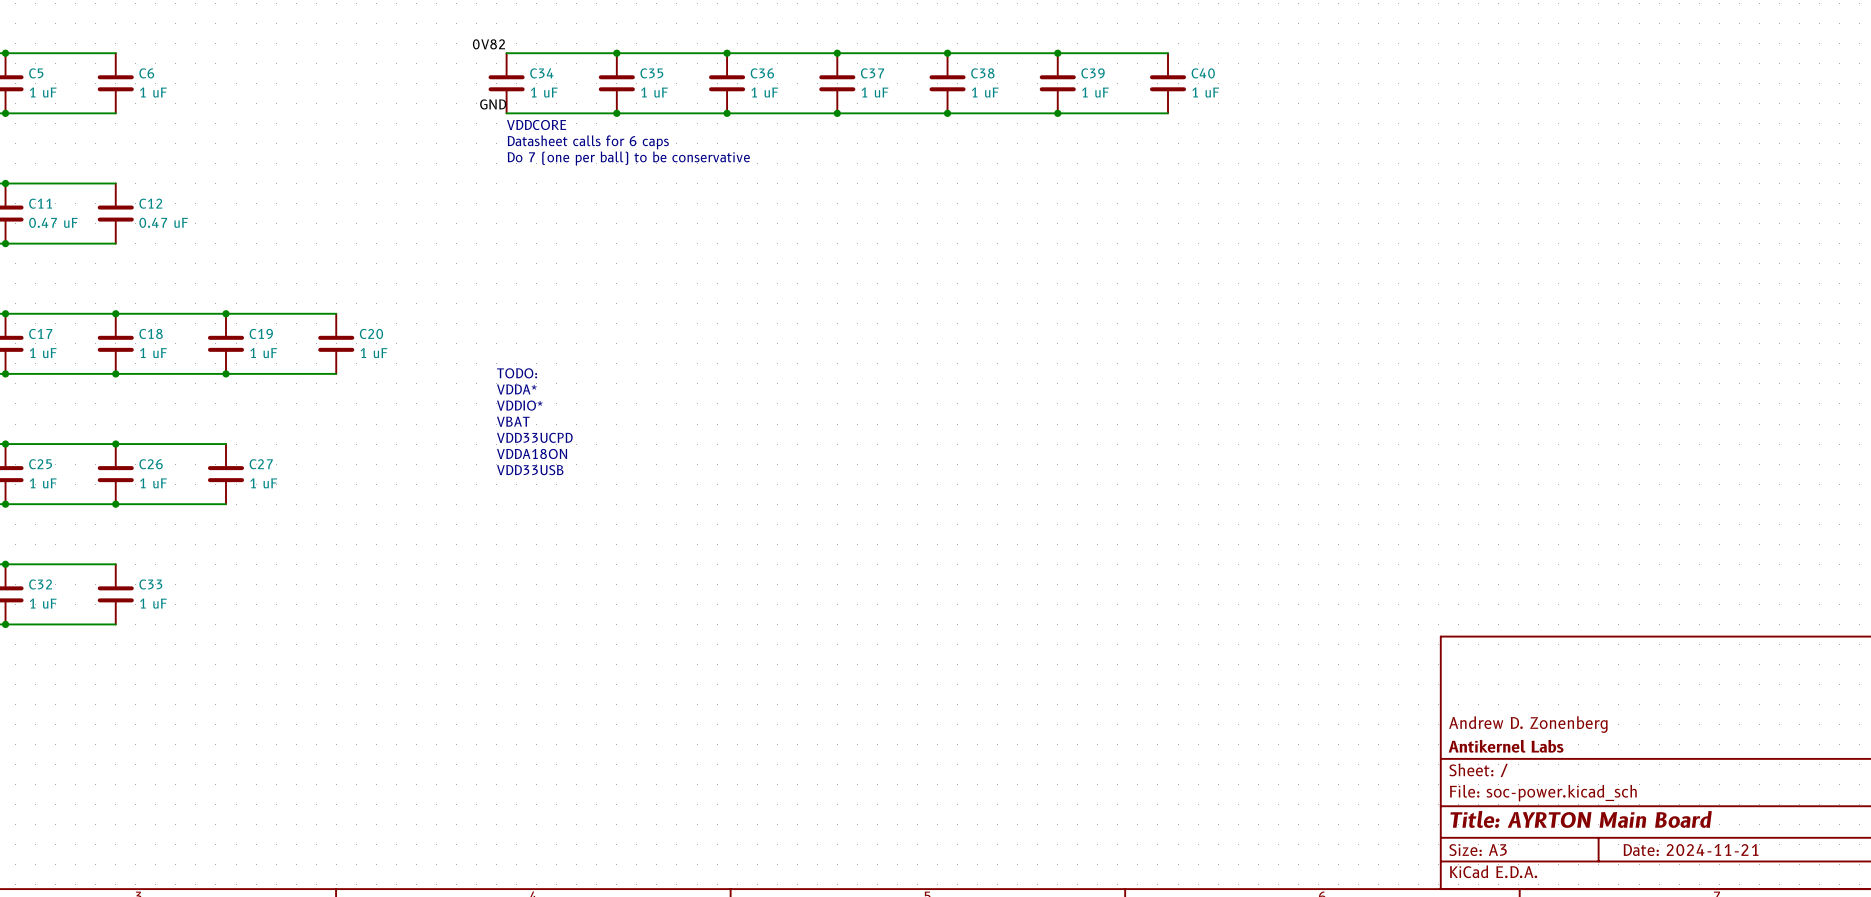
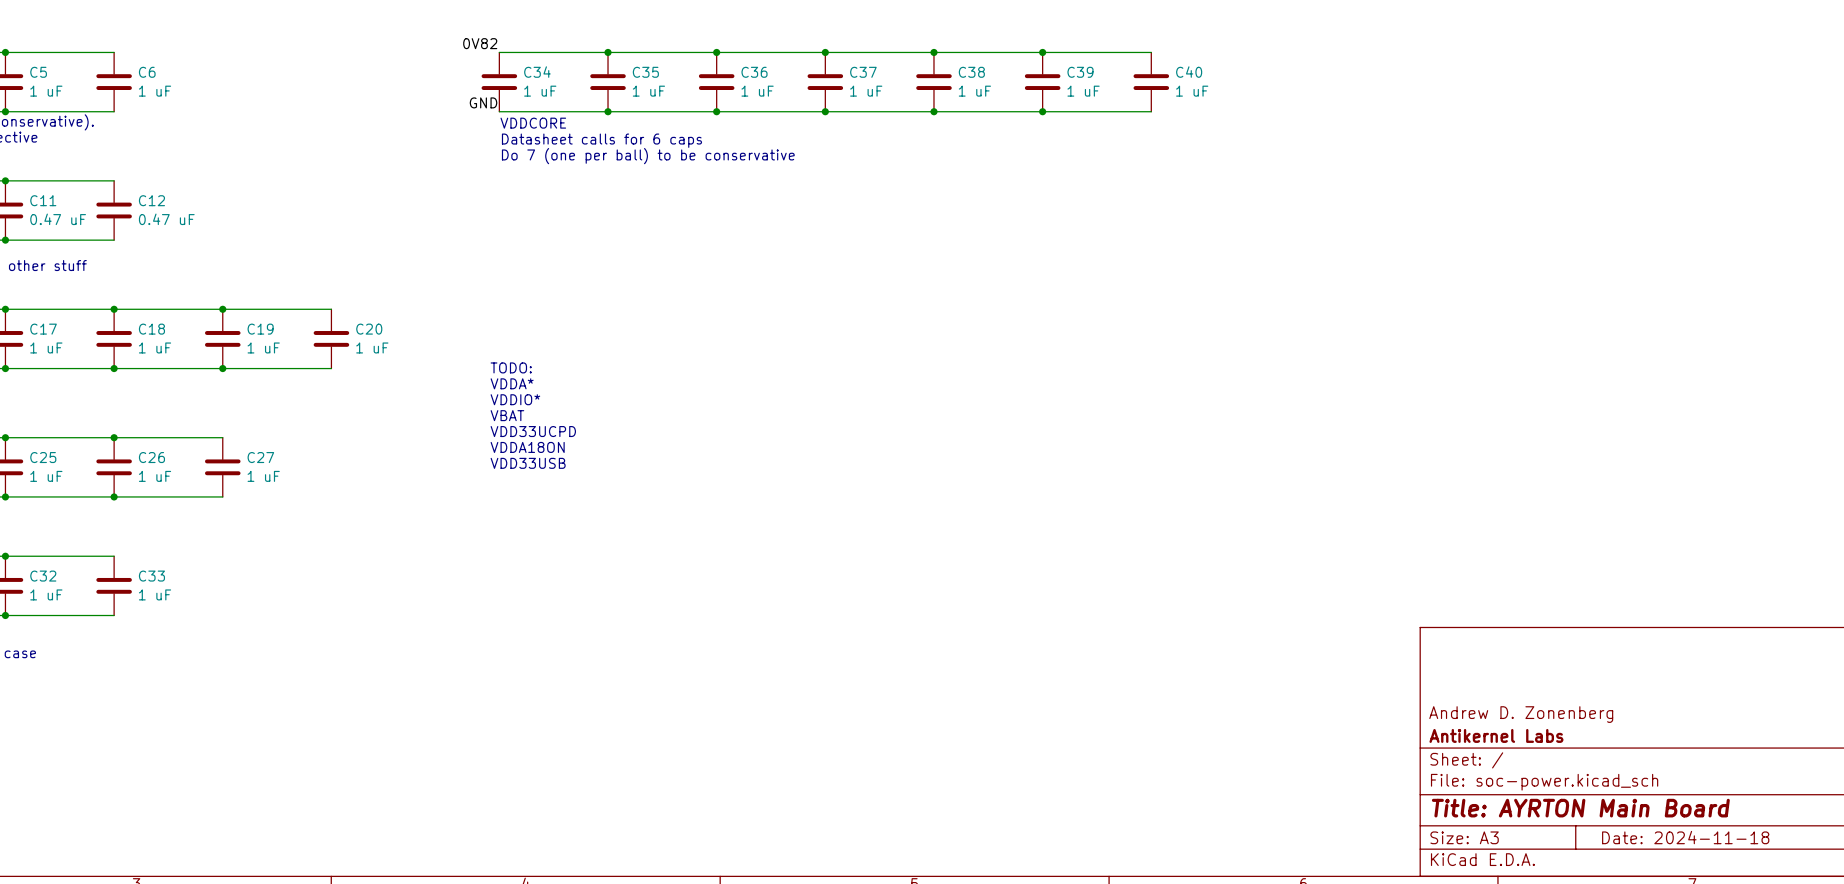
title block: Date: 2024-11-21 (1691, 850) -> Date: 2024-11-18 (1685, 837)

